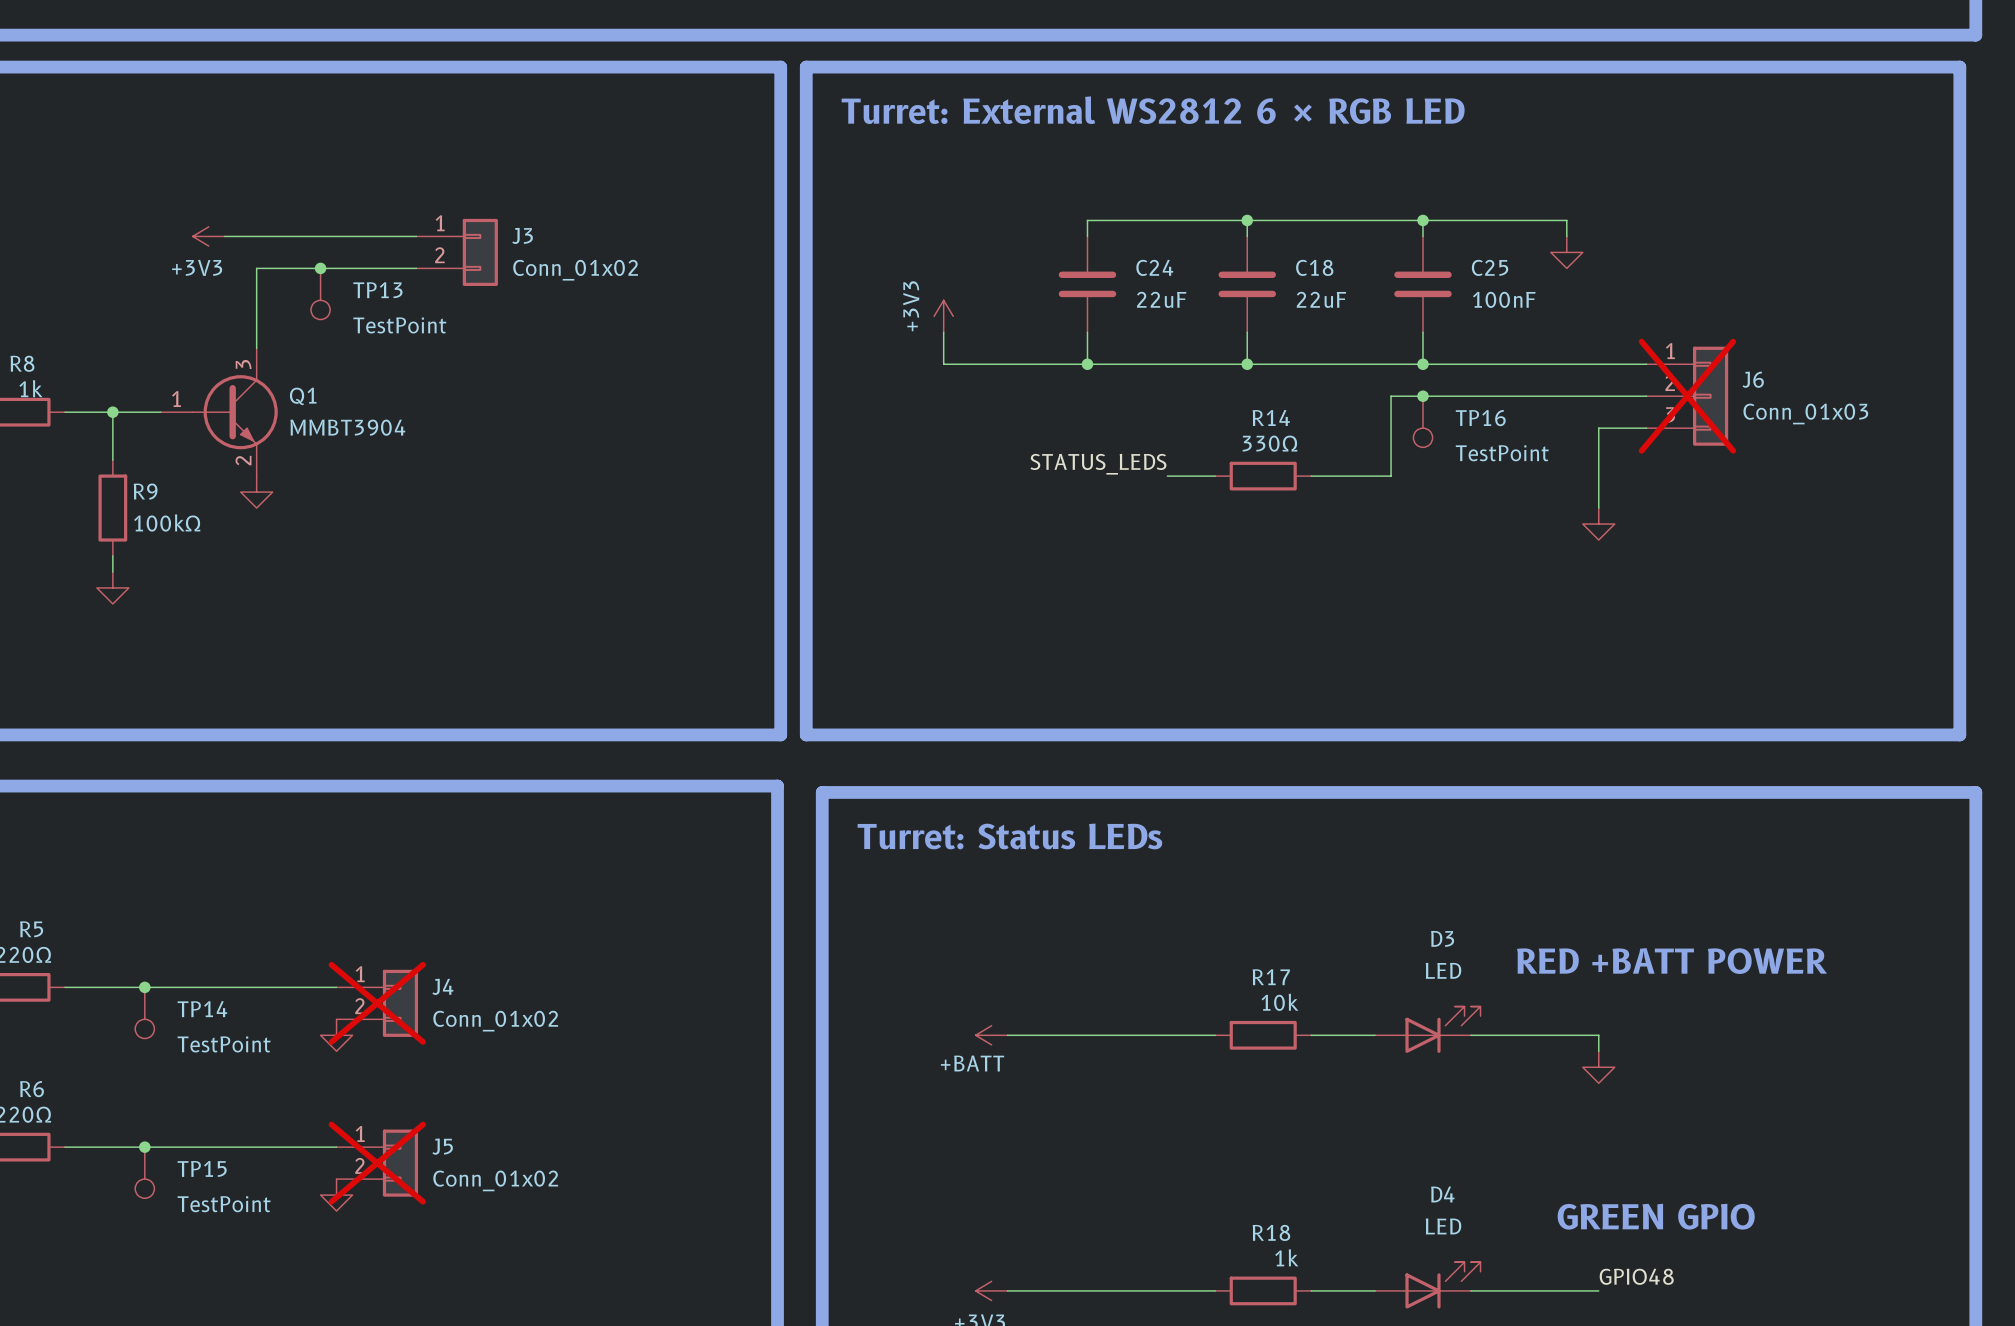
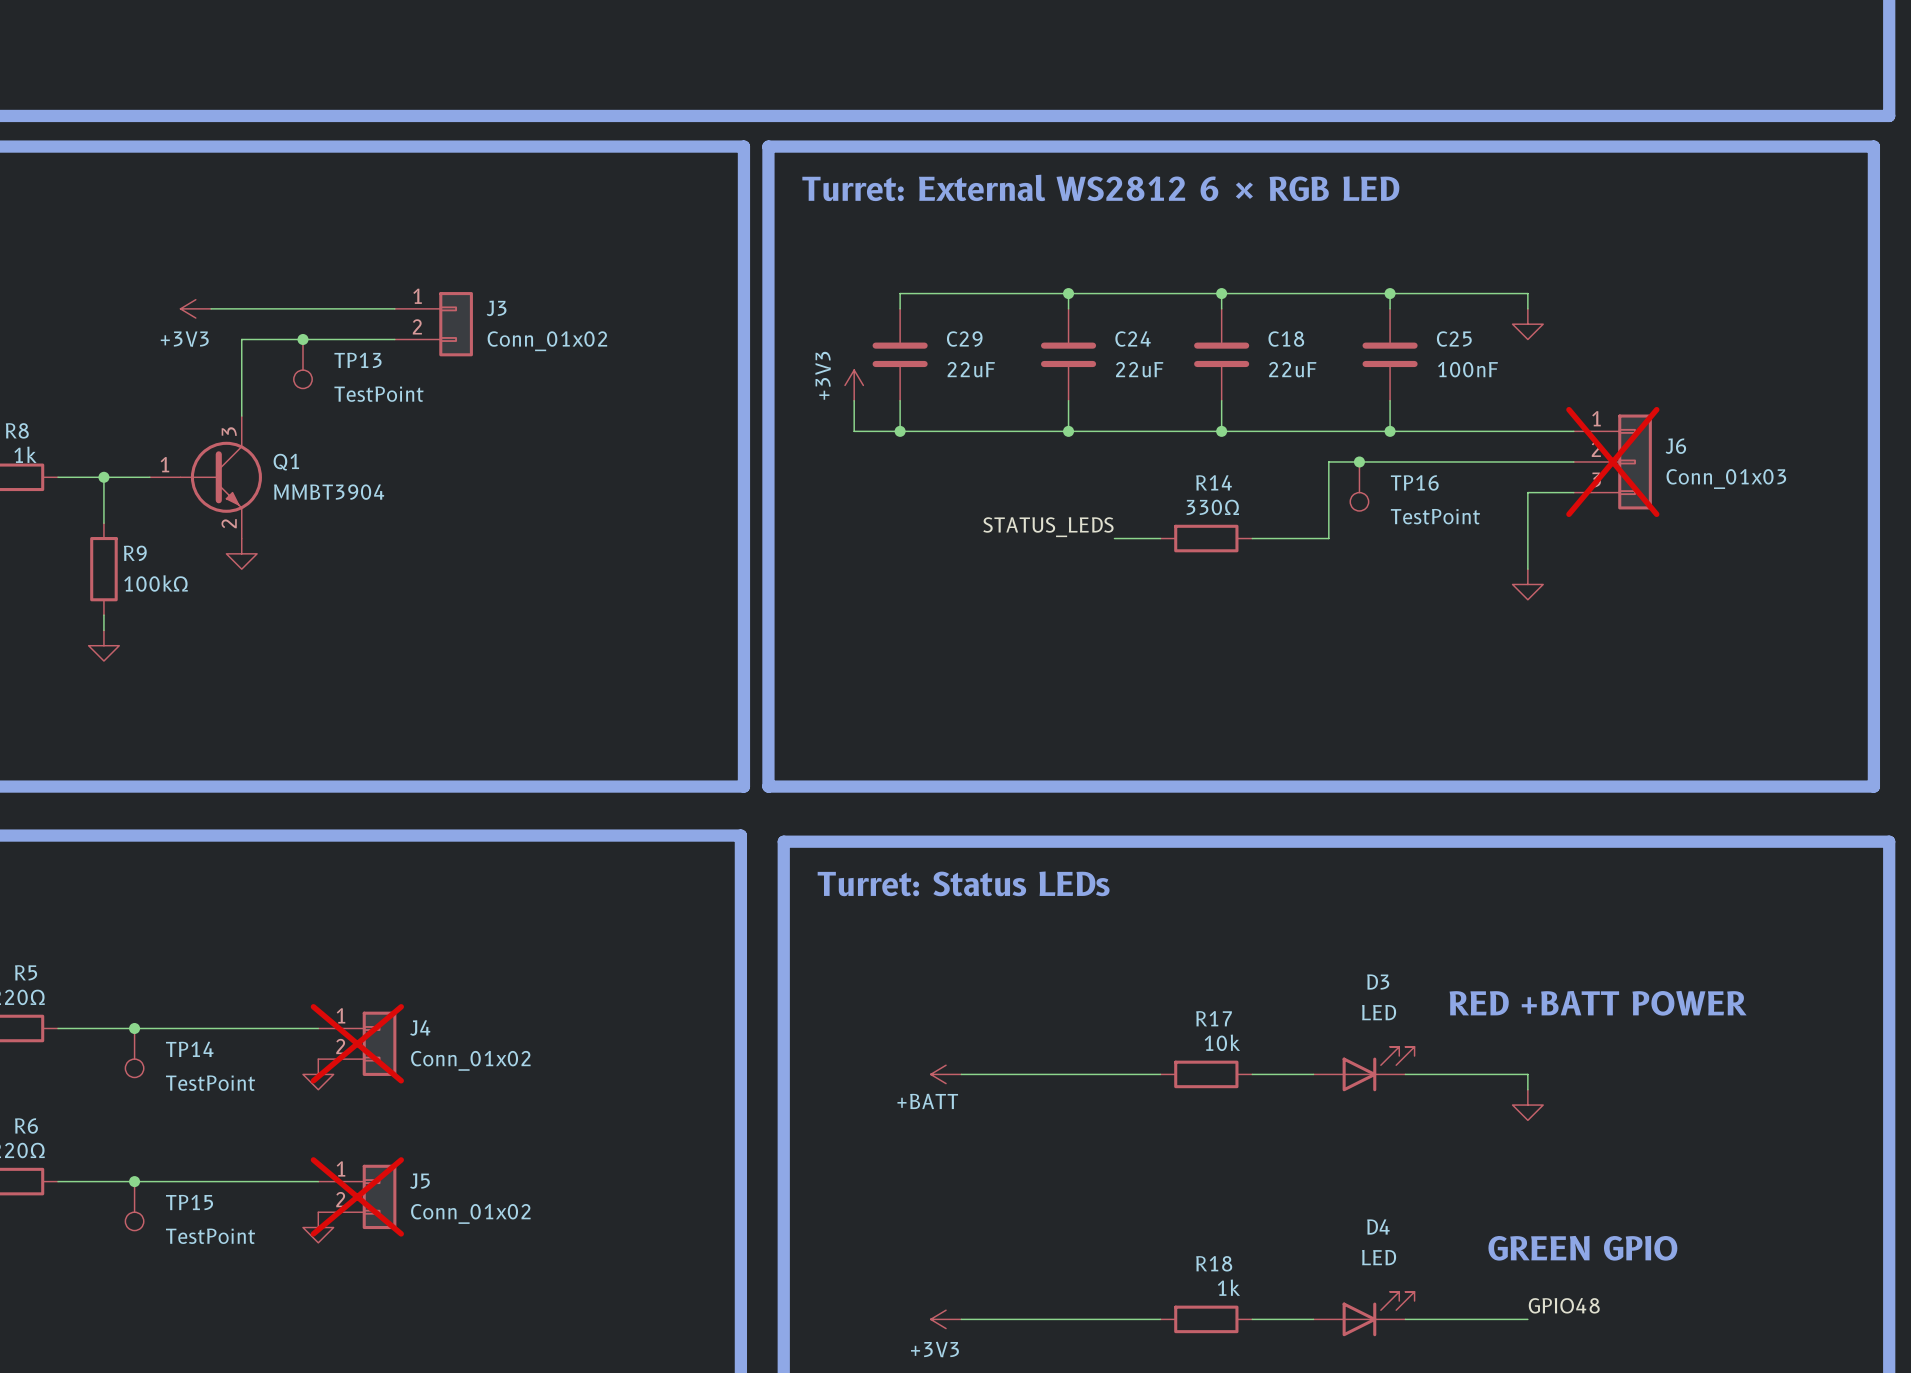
wire: (1087, 220) (1087, 236) -> (1037, 293) (900, 293) (900, 308)
wire: none -> (1068, 293) (1068, 308)
junction: none -> (1068, 293)
wire: (1247, 220) (1247, 236) -> (1221, 293) (1221, 308)
junction position: (1247, 220) -> (1221, 293)
wire: (1423, 220) (1423, 236) -> (1390, 293) (1390, 308)
junction position: (1423, 220) -> (1390, 293)
wire: (1566, 220) (1566, 236) -> (1497, 293) (1527, 293) (1527, 308)
power symbol position: (1566, 252) -> (1527, 324)
C29: none -> 22uF (900, 354)
C24 position: (1087, 284) -> (1068, 354)
C18 position: (1247, 284) -> (1221, 354)
C25 position: (1423, 284) -> (1390, 354)
power symbol position: +3V3 (943, 316) -> +3V3 (854, 385)
wire: none -> (854, 400) (854, 431) (900, 431)
wire: (1087, 332) (1087, 364) -> (1068, 400) (1068, 431)
wire: (1247, 332) (1247, 364) -> (1221, 400) (1221, 431)
wire: (1423, 332) (1423, 364) -> (1390, 400) (1390, 431)
junction: none -> (900, 431)
junction position: (1087, 364) -> (1068, 431)
junction position: (1247, 364) -> (1221, 431)
junction position: (1423, 364) -> (1390, 431)

